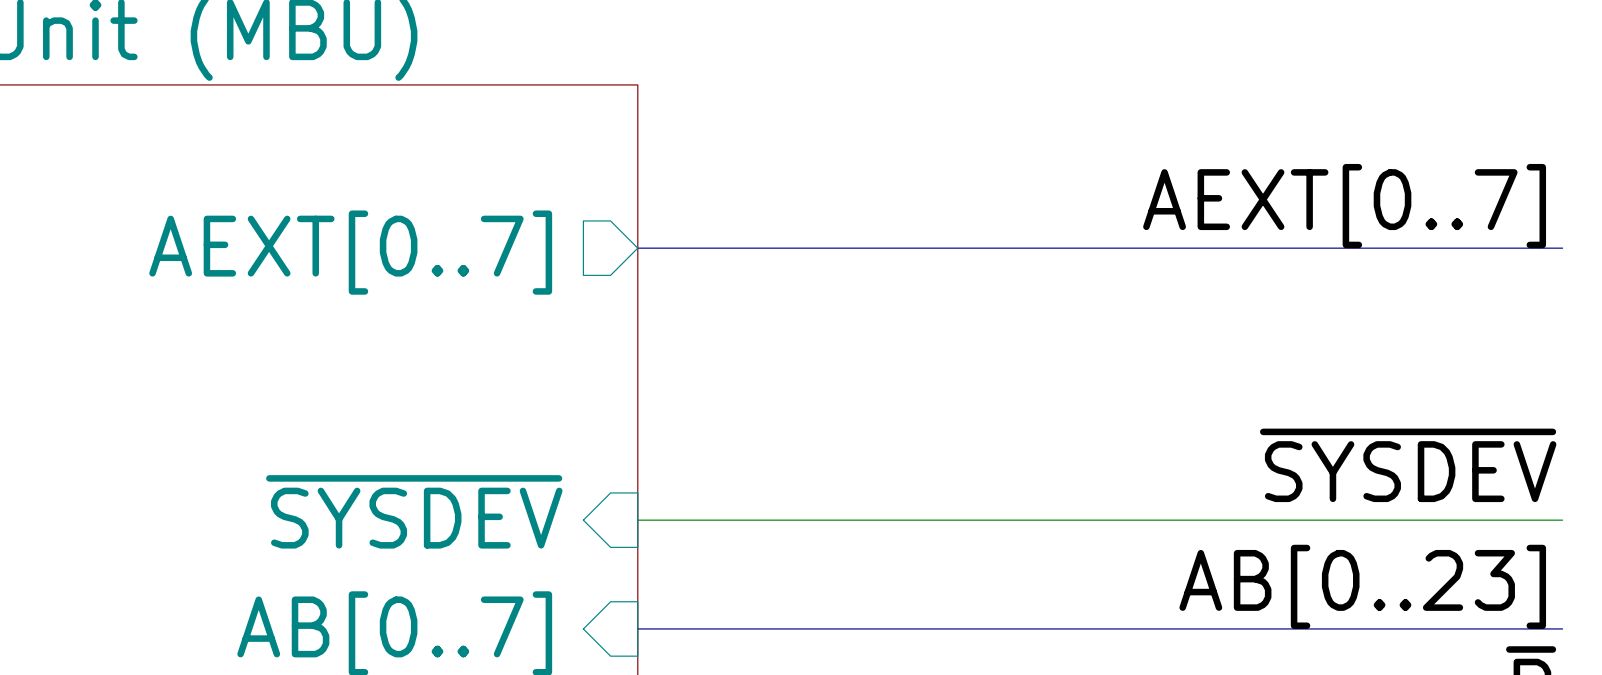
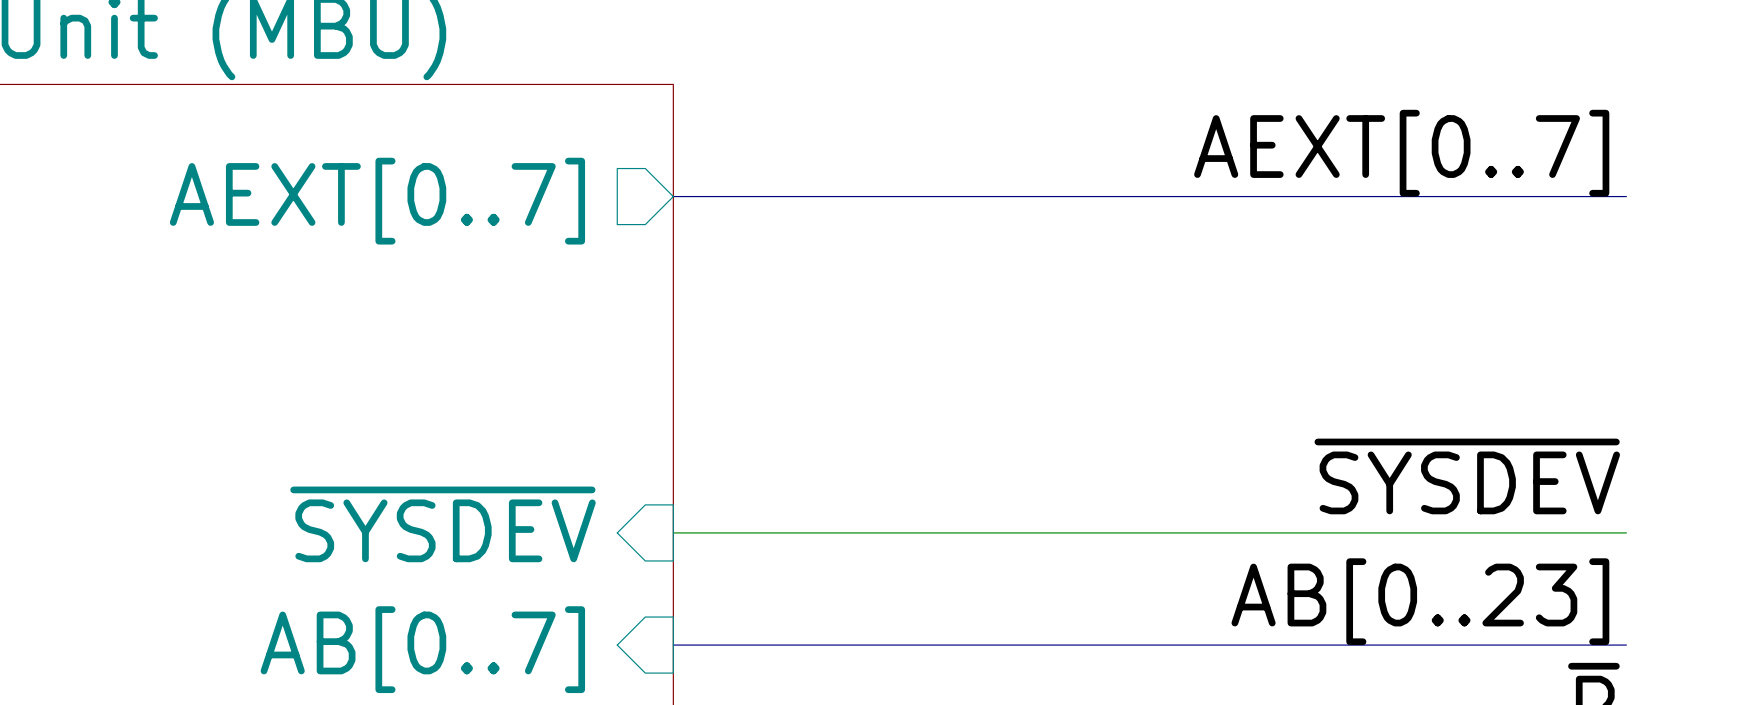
label position: AEXT[0..7] (1344, 206) -> AEXT[0..7] (1401, 153)
bus: (637, 248) (1562, 248) -> (673, 196) (1626, 196)
sheet pin position: AEXT[0..7] (350, 252) -> AEXT[0..7] (377, 201)

